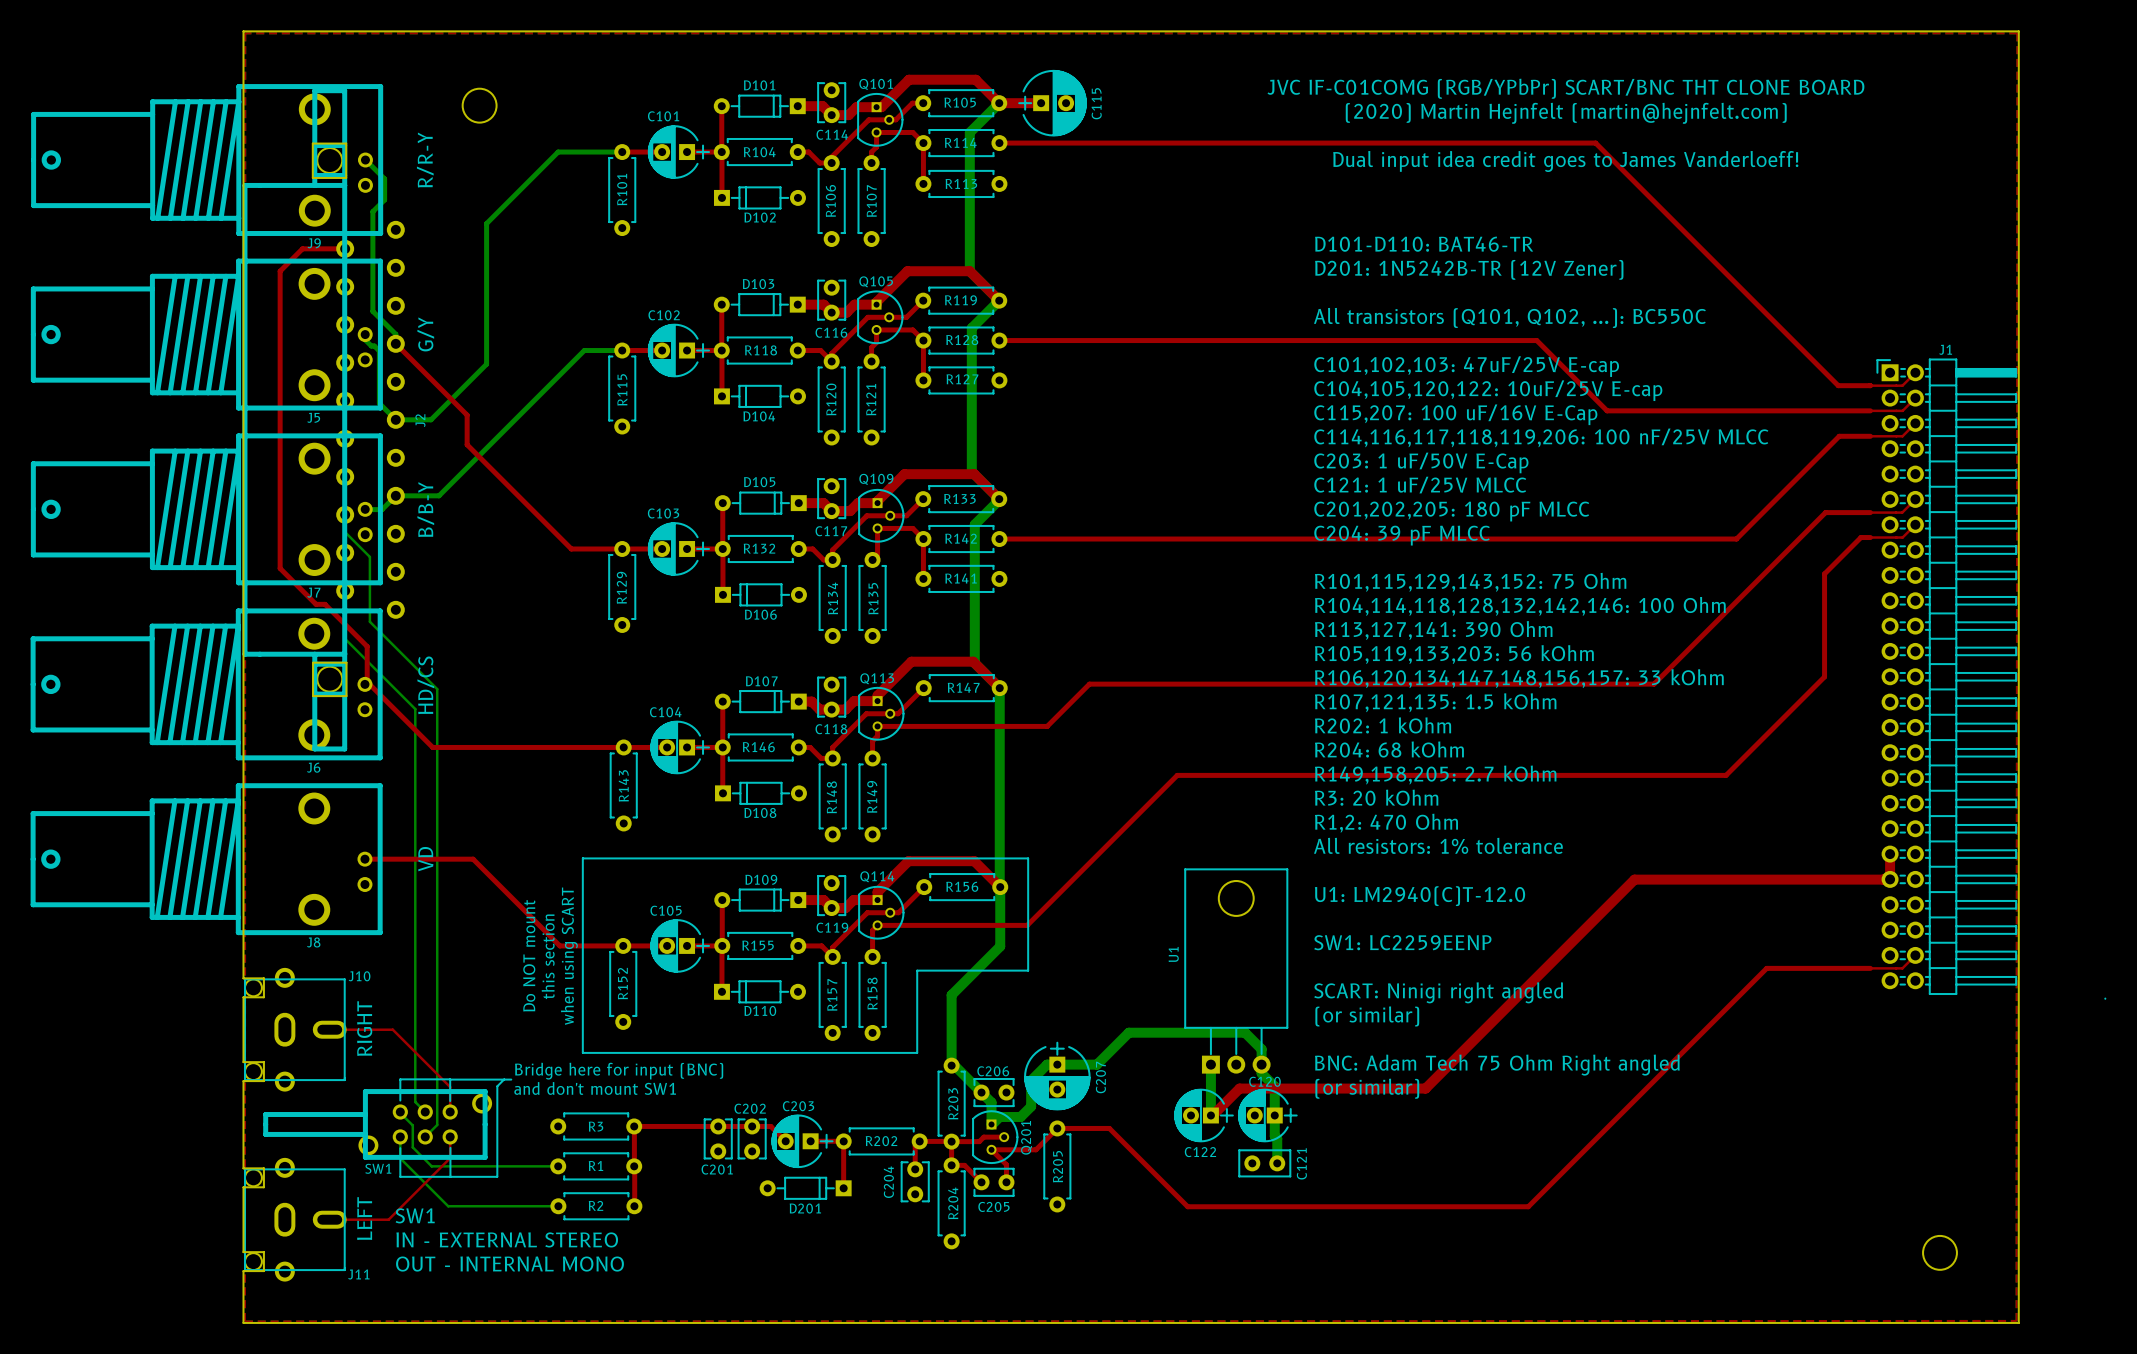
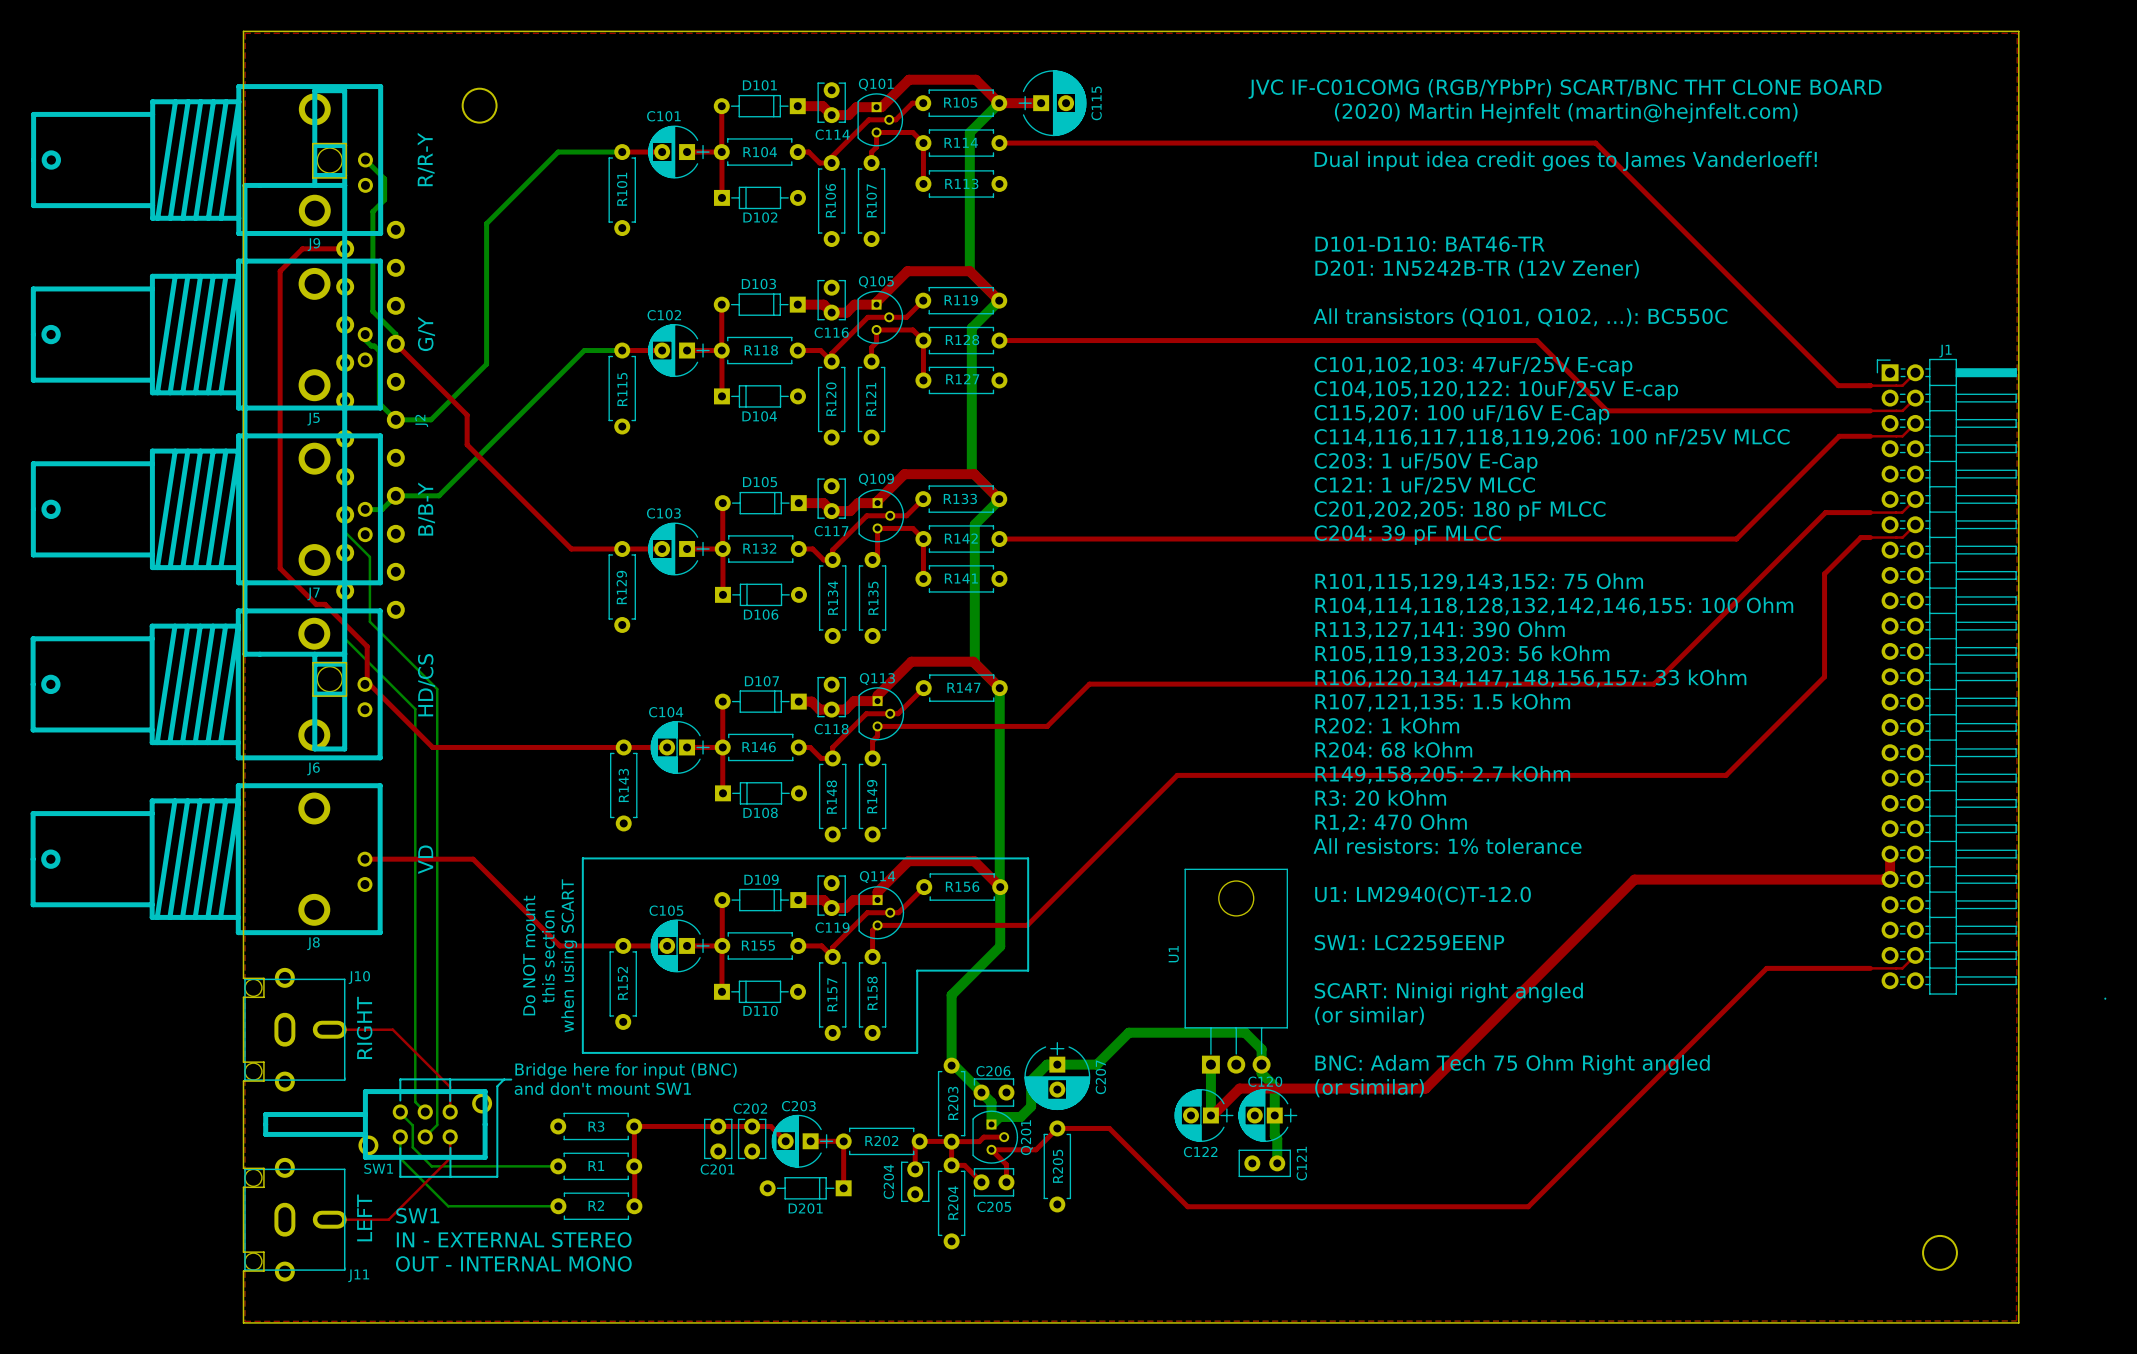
text: R104,114,118,128,132,142,146: 100 Ohm (1520, 606) -> R104,114,118,128,132,142,146,155: 100 Ohm (1554, 606)

